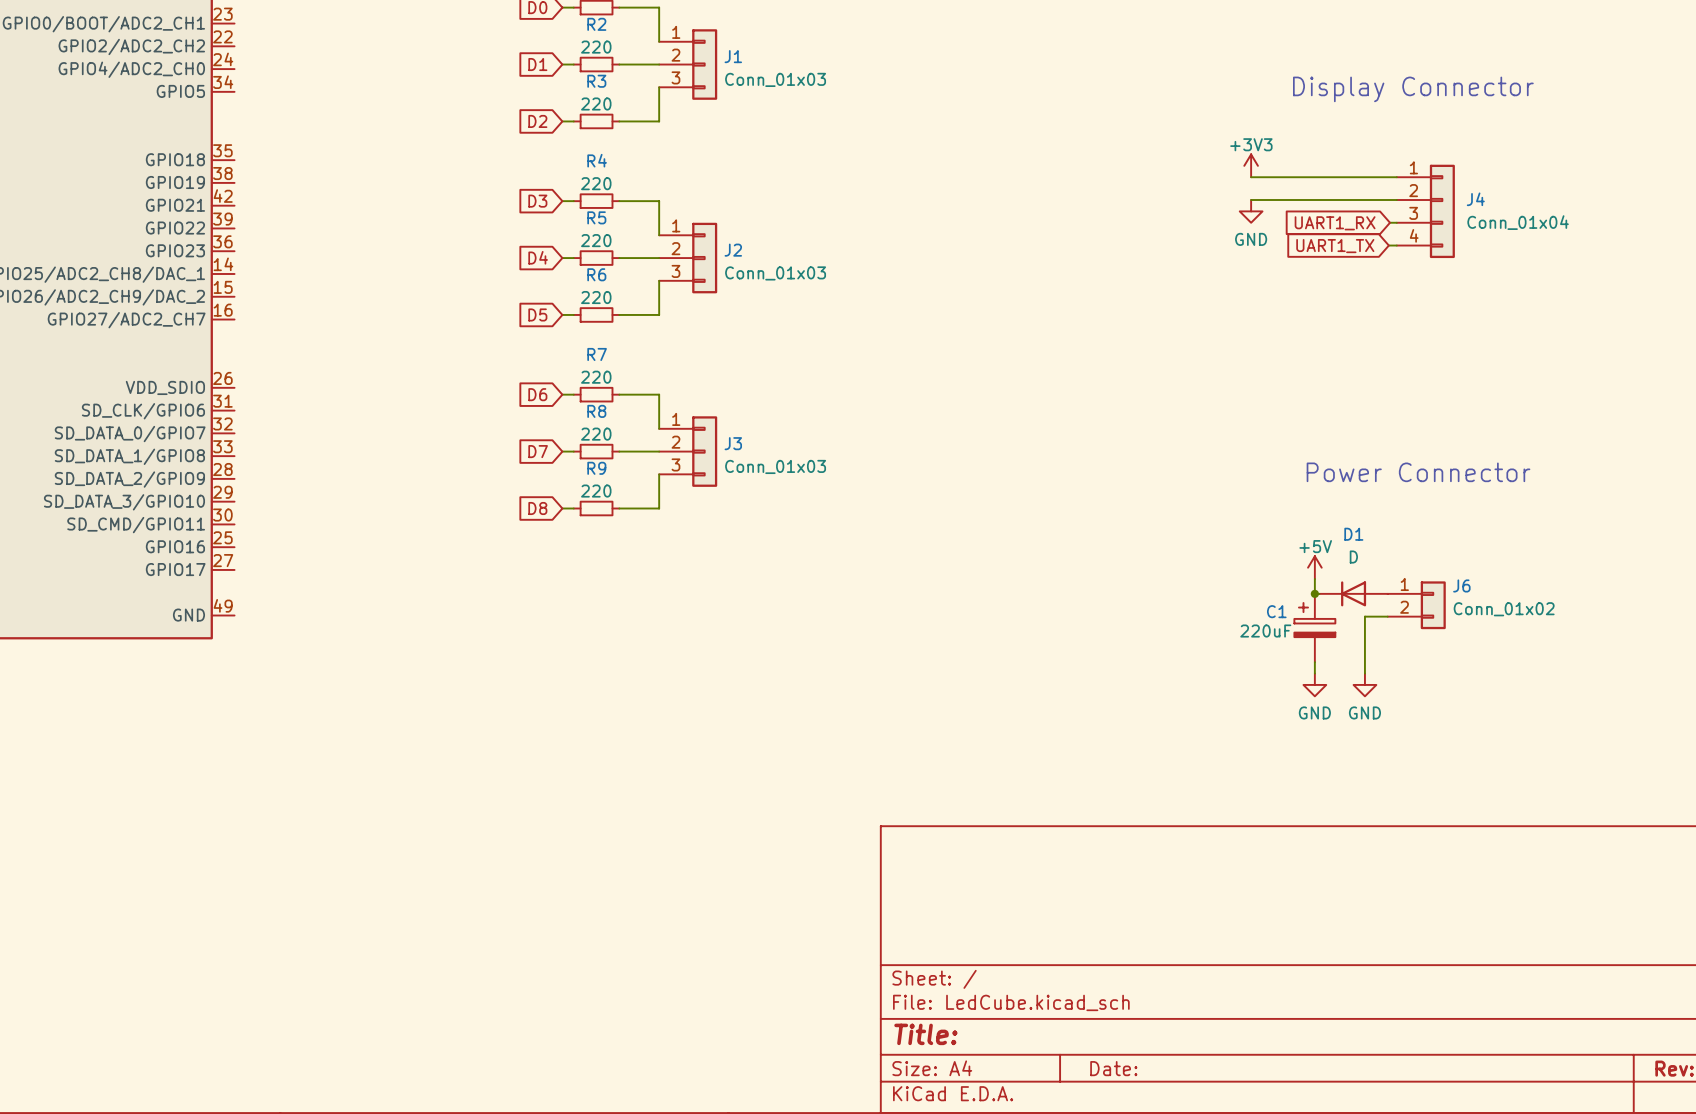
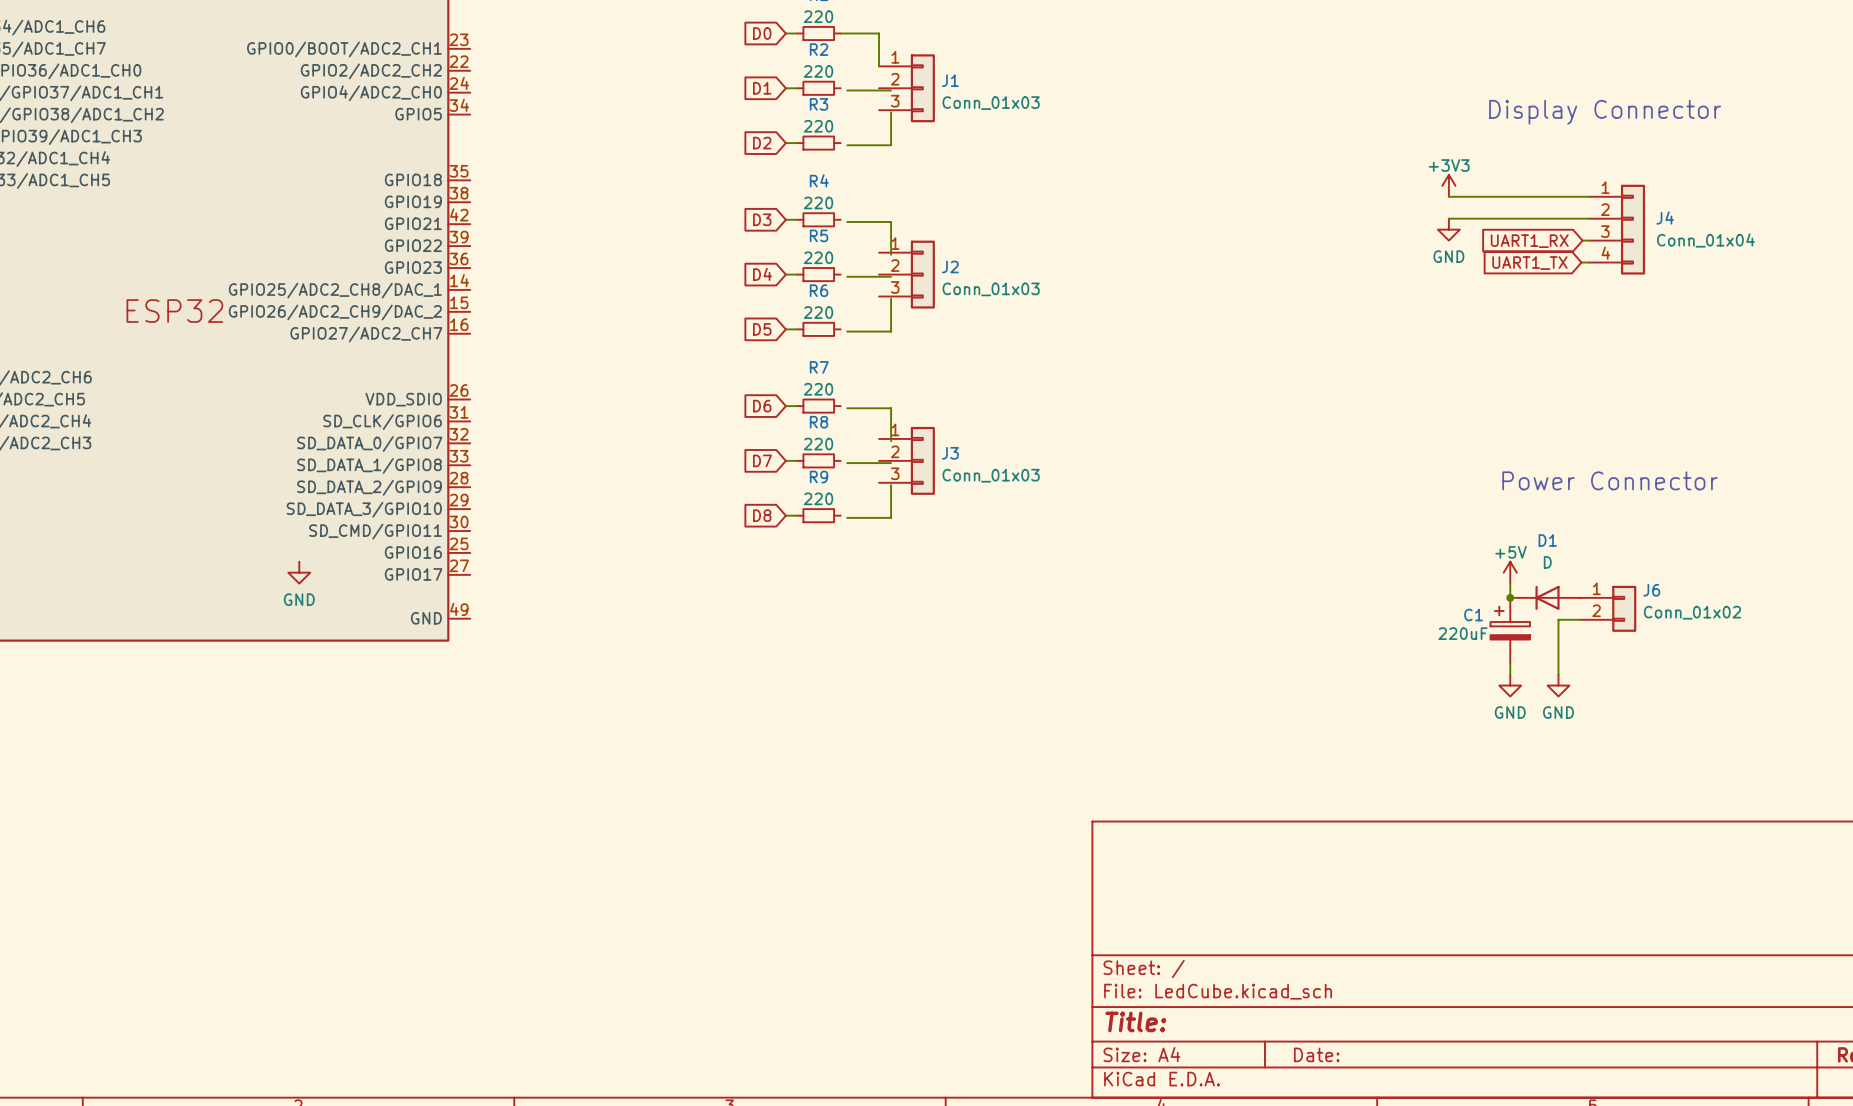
wire: (619, 64) (659, 64) -> none
wire: none -> (847, 90) (891, 90)
wire: (659, 87) (659, 121) (619, 121) -> none
wire: none -> (891, 112) (891, 145) (847, 145)
wire: (619, 201) (659, 201) (659, 235) -> none
wire: none -> (847, 221) (891, 221) (891, 254)
wire: (619, 258) (659, 258) -> none
wire: none -> (847, 276) (891, 276)
wire: (659, 280) (659, 314) (619, 314) -> none
wire: none -> (891, 298) (891, 331) (847, 331)
wire: (619, 394) (659, 394) (659, 428) -> none
wire: none -> (847, 408) (891, 408) (891, 441)
wire: (619, 451) (659, 451) -> none
wire: none -> (847, 463) (891, 463)
wire: (659, 474) (659, 508) (619, 508) -> none
wire: none -> (891, 485) (891, 517) (847, 517)
power symbol: none -> GND (299, 572)

